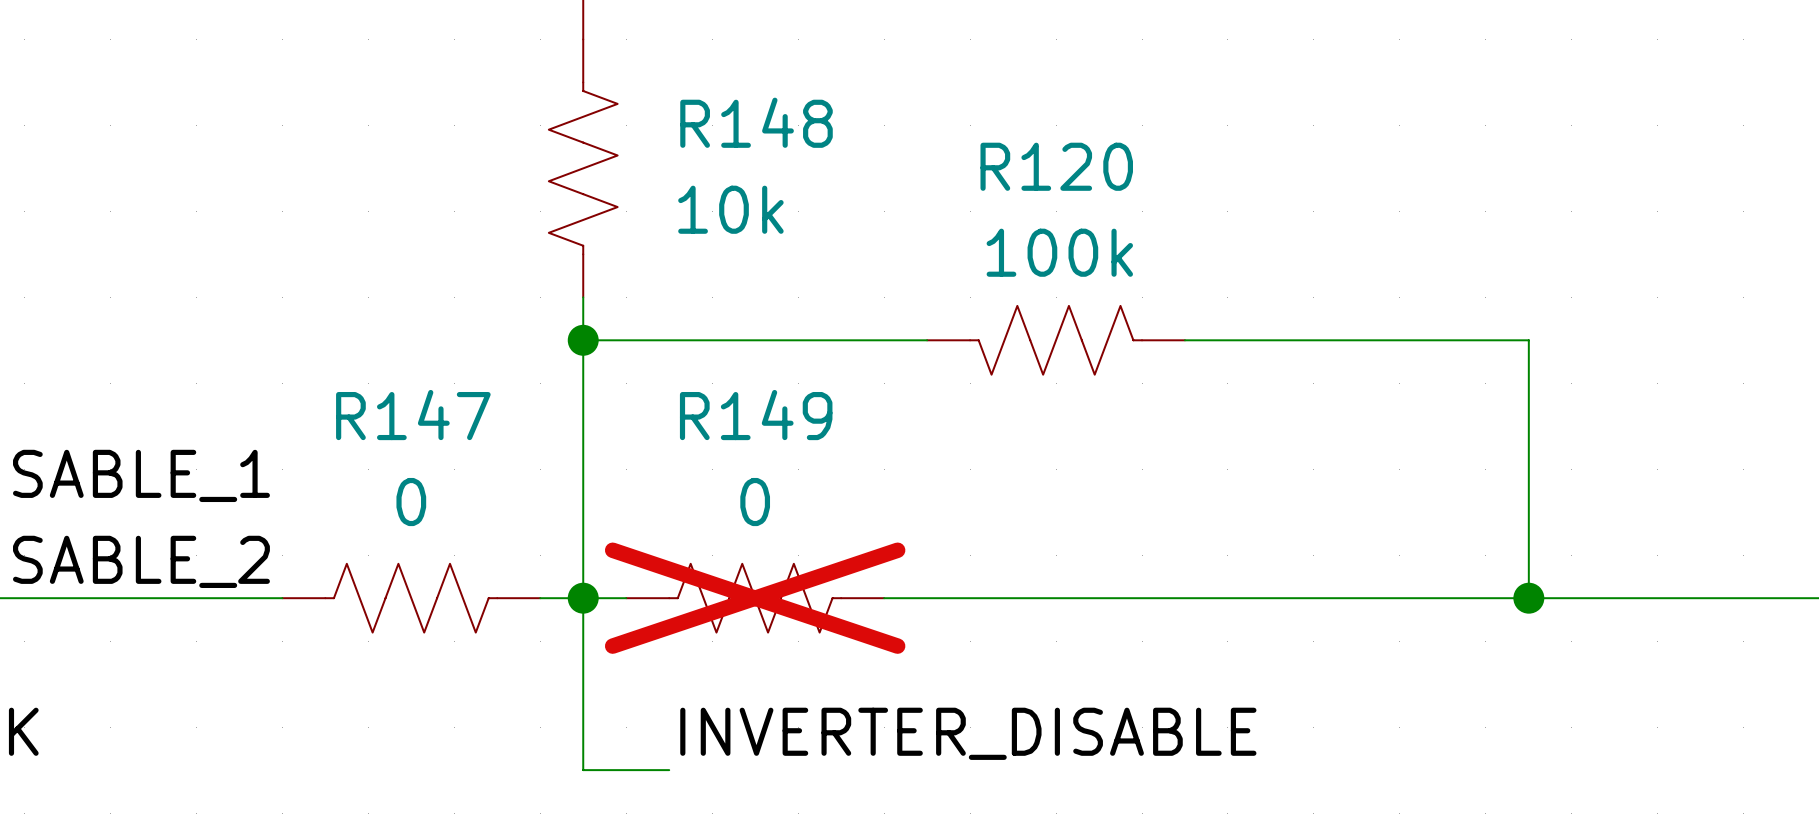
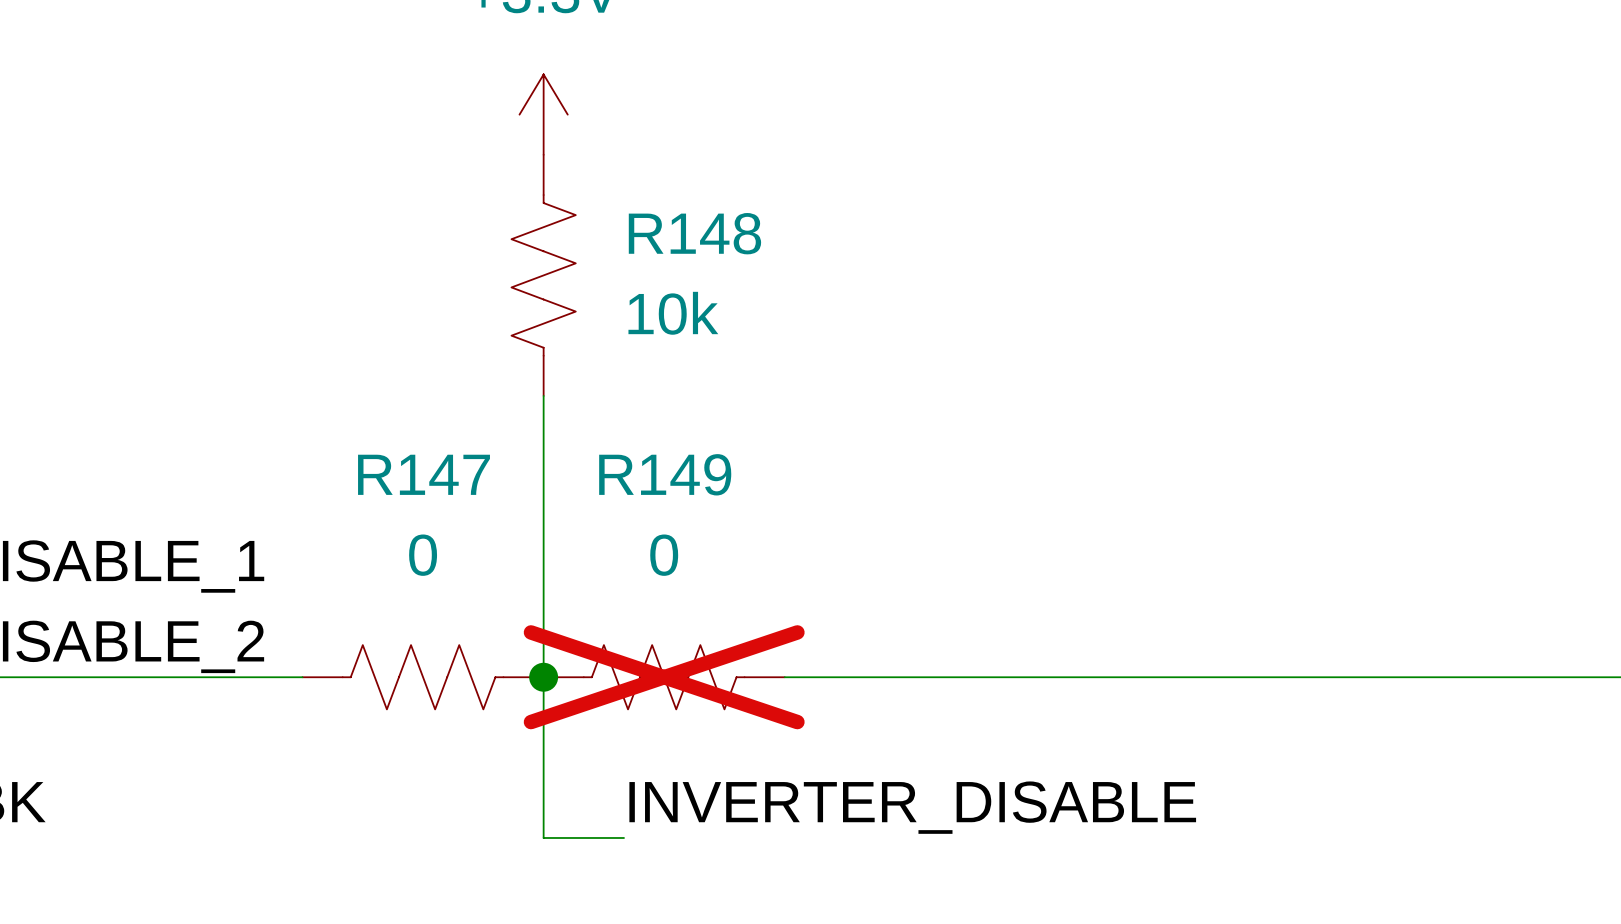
wire: (583, 340) (927, 340) -> none
junction: (583, 340) -> none
R120: 100k (1056, 340) -> none
wire: (1184, 340) (1528, 340) (1528, 598) -> none
R147 name position: R147 (413, 415) -> R147 (424, 474)
R149 name position: R149 (756, 415) -> R149 (665, 474)
R147 value position: 0 (411, 502) -> 0 (423, 555)
R149 value position: 0 (755, 502) -> 0 (664, 555)
R147 position: (411, 598) -> (423, 677)
R149 position: (755, 598) -> (664, 677)
junction: (1528, 598) -> none

